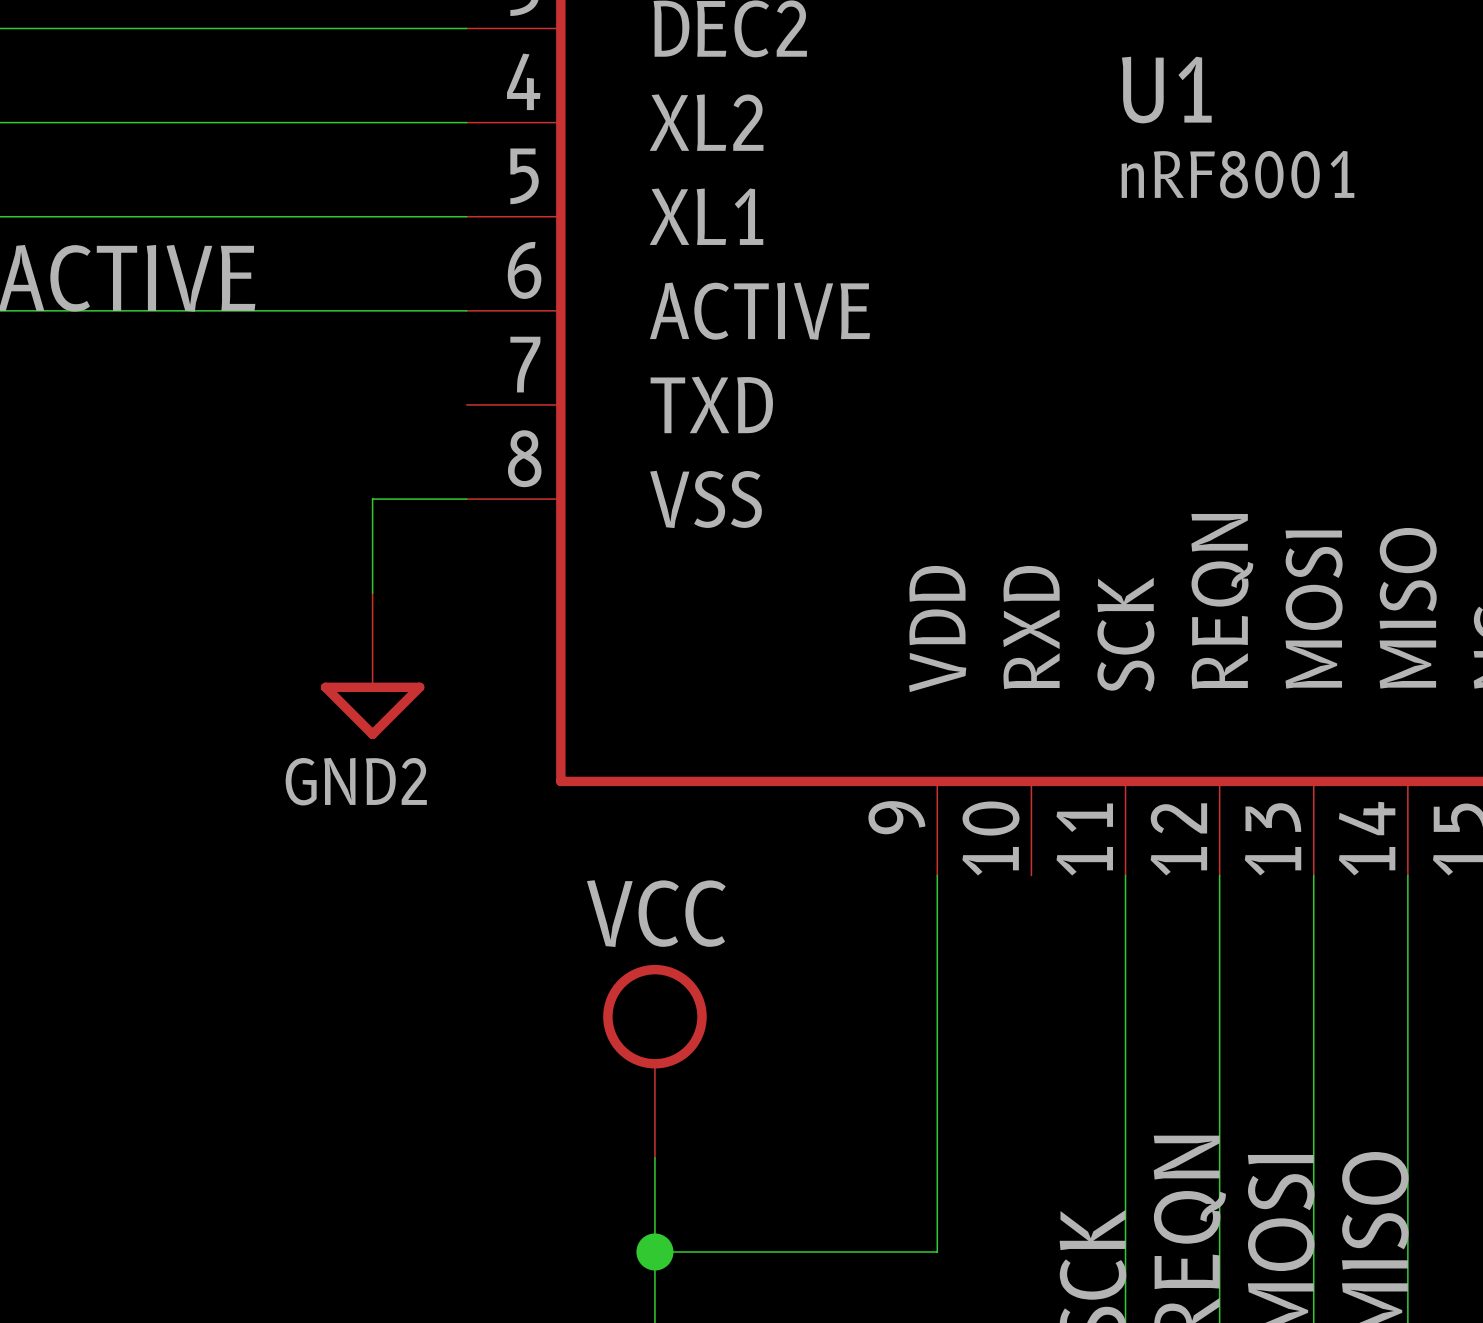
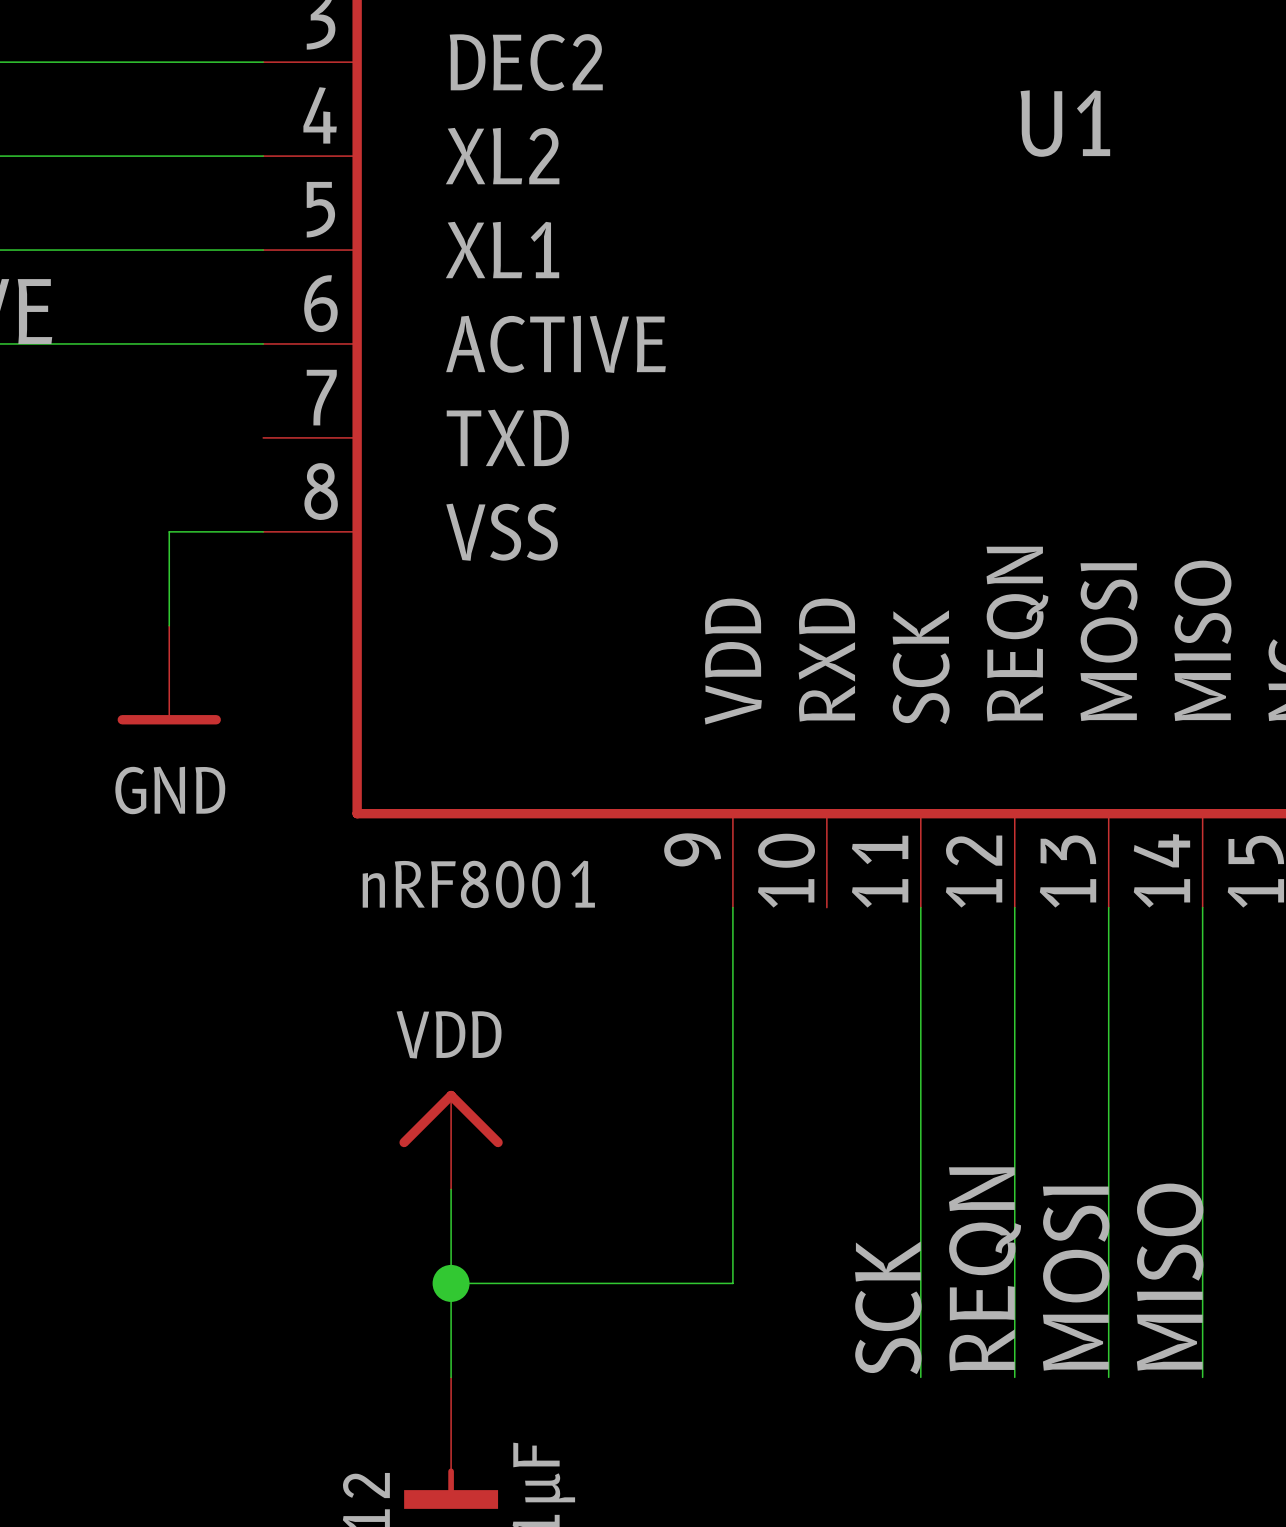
U1 name position: U1 (1166, 90) -> U1 (1065, 123)
U1 value position: nRF8001 (1238, 174) -> nRF8001 (478, 884)
power symbol: GND2 (372, 666) -> GND (169, 675)
power symbol: VCC (654, 1061) -> none
power symbol: none -> VDD (451, 1140)

